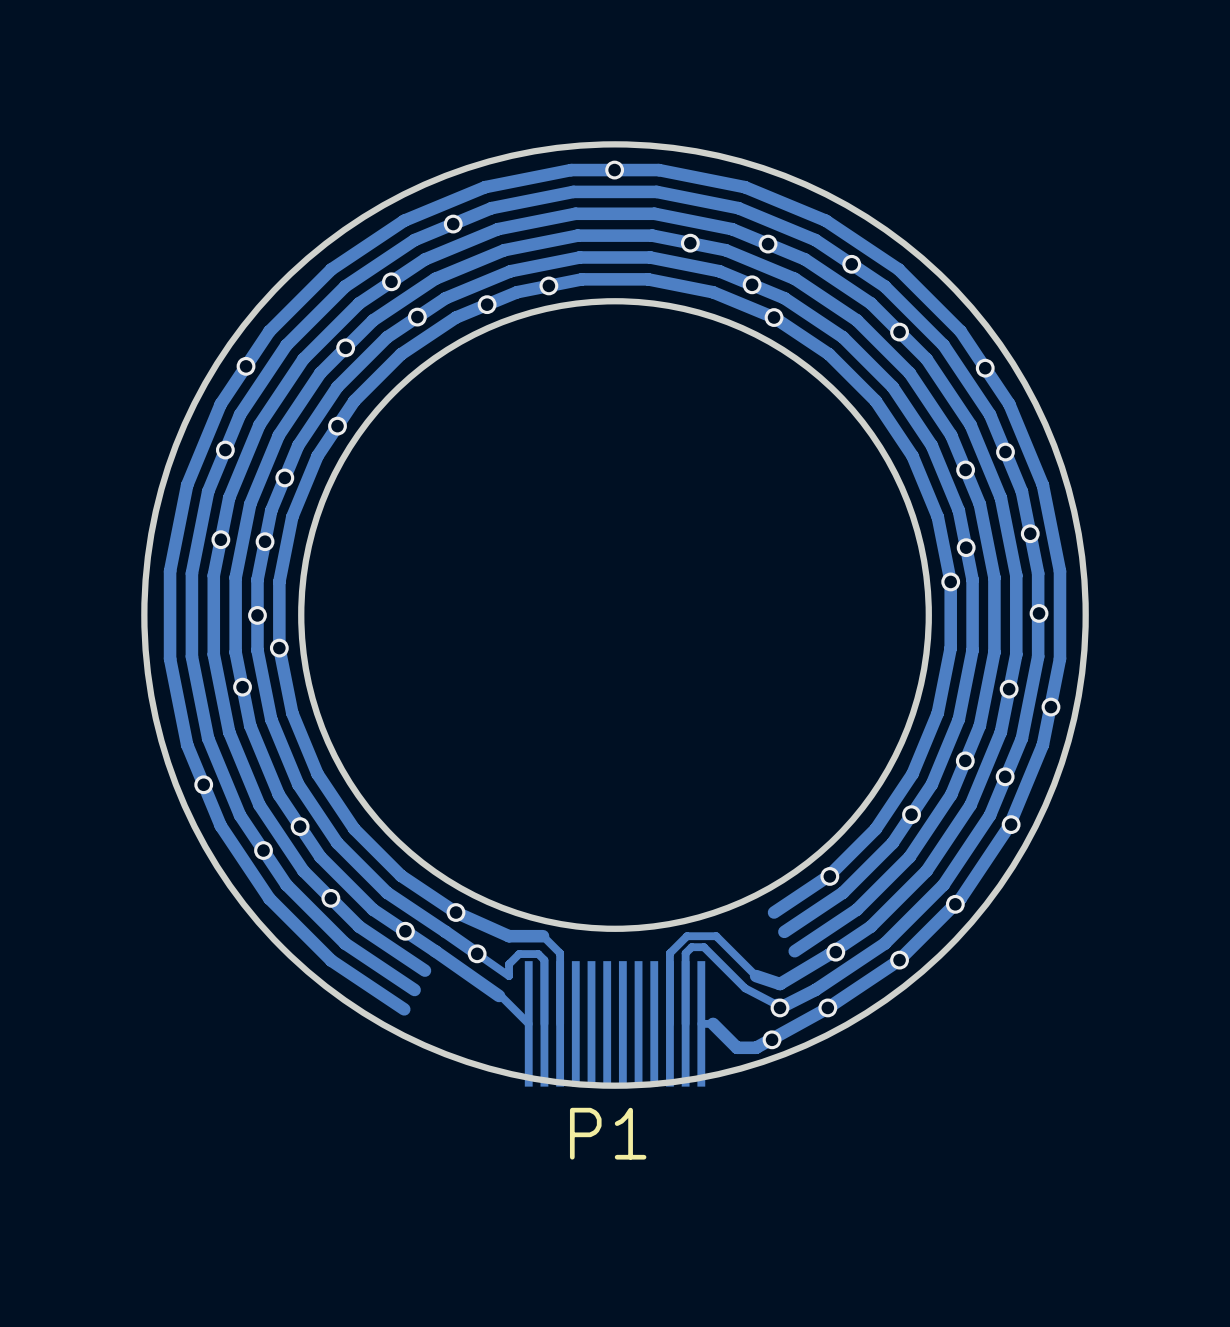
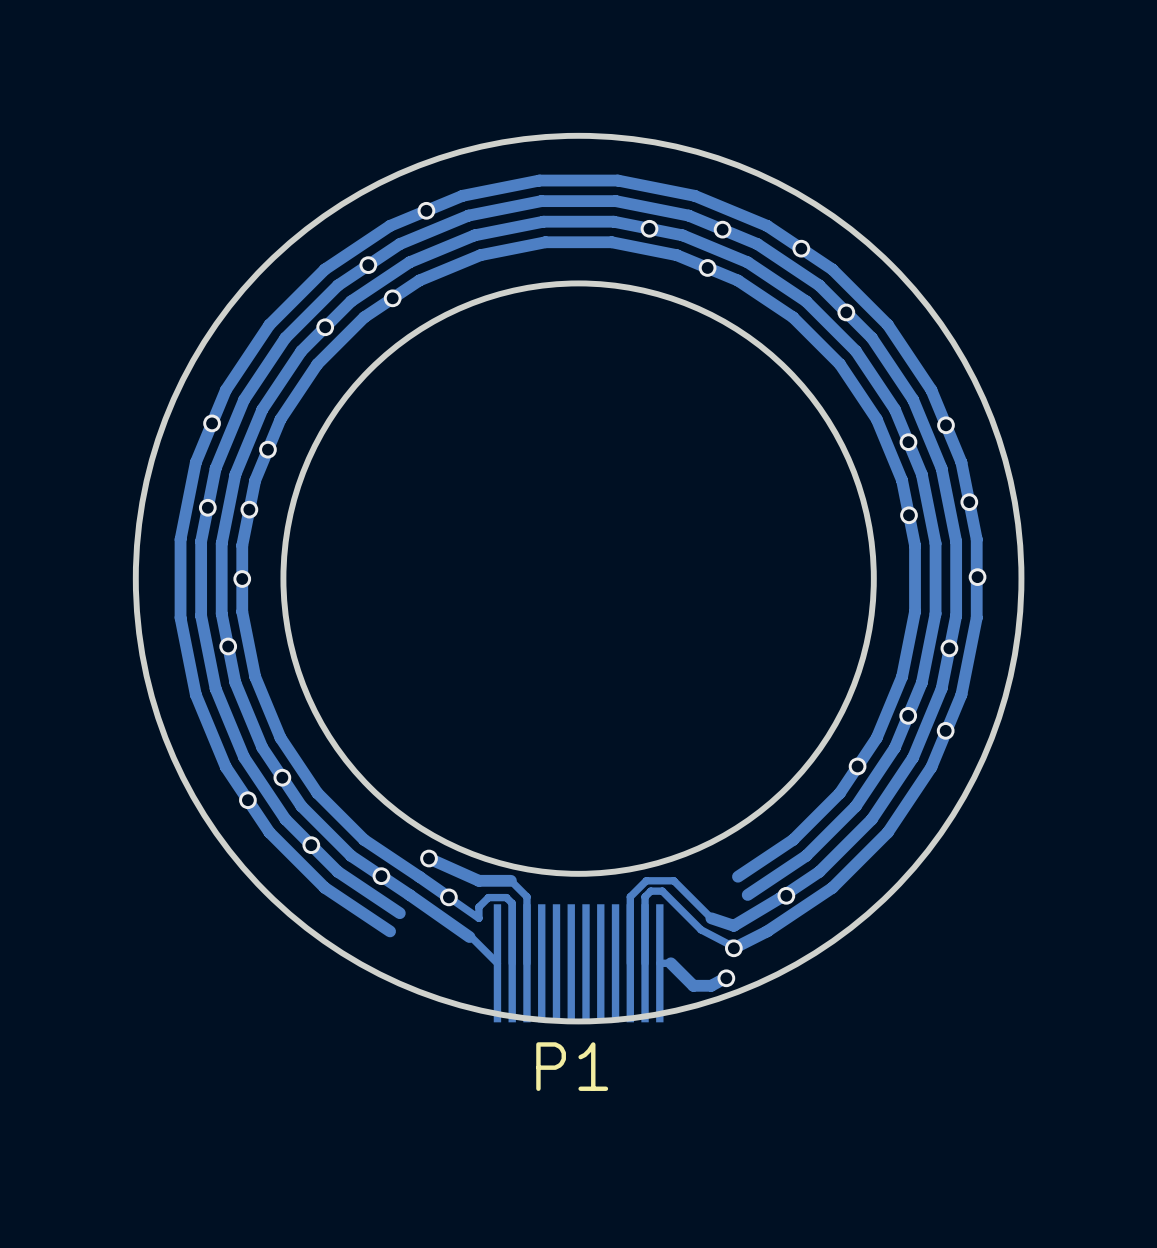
via: (614, 170) -> none
via: (548, 285) -> none
via: (487, 304) -> none
via: (774, 317) -> none
via: (246, 366) -> none
via: (985, 368) -> none
via: (337, 426) -> none
via: (950, 581) -> none
via: (279, 648) -> none
via: (1050, 707) -> none
via: (203, 784) -> none
via: (1011, 824) -> none
track: (1009, 825) (960, 898) (898, 960) (825, 1009) (771, 1039) -> none
track: (1009, 825) (1042, 744) (1059, 658) (1059, 571) (1042, 485) (1009, 404) (960, 331) (898, 269) (825, 220) (744, 187) (658, 170) (571, 170) (485, 187) (404, 220) (331, 269) (269, 331) (220, 404) (187, 485) (170, 571) (170, 658) (187, 744) (220, 825) (269, 898) (331, 960) (404, 1009) -> none
track: (829, 875) (875, 829) (912, 774) (937, 712) (950, 648) (950, 581) (937, 517) (912, 456) (875, 401) (829, 354) (774, 317) (712, 292) (648, 279) (581, 279) (517, 292) (456, 317) (401, 354) (354, 401) (317, 456) (292, 517) (279, 581) (279, 648) (292, 712) (317, 774) (354, 829) (401, 875) (456, 912) -> none
track: (829, 875) (774, 912) -> none
via: (829, 876) -> none
via: (955, 904) -> none
via: (899, 960) -> none
via: (827, 1007) -> none

